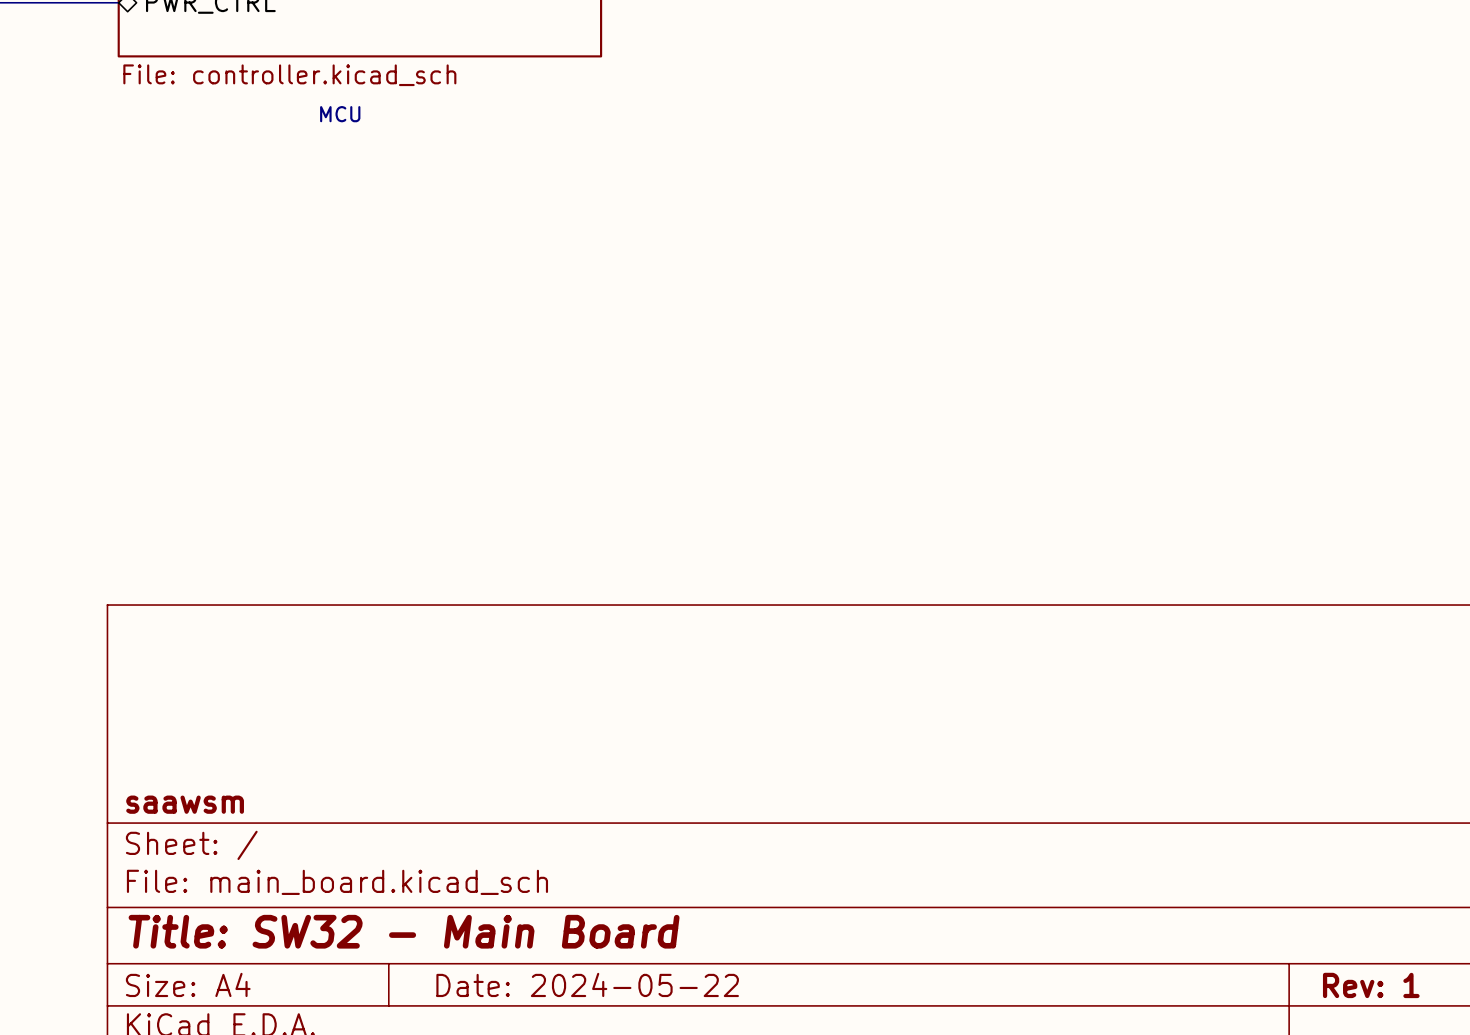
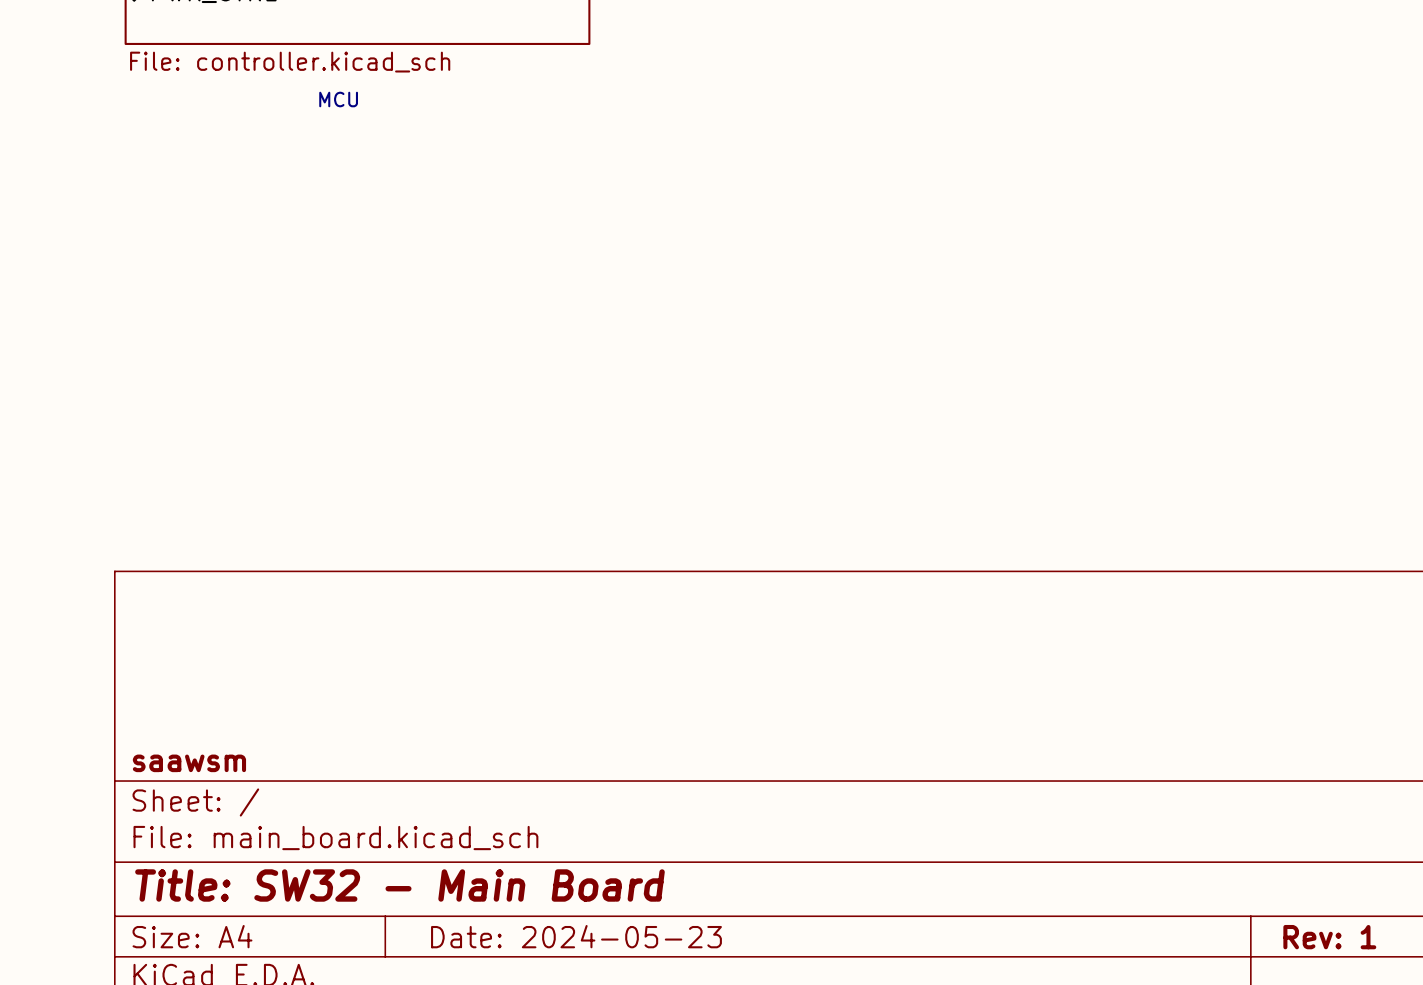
title block: Date: 2024-05-22 (587, 984) -> Date: 2024-05-23 (576, 936)

